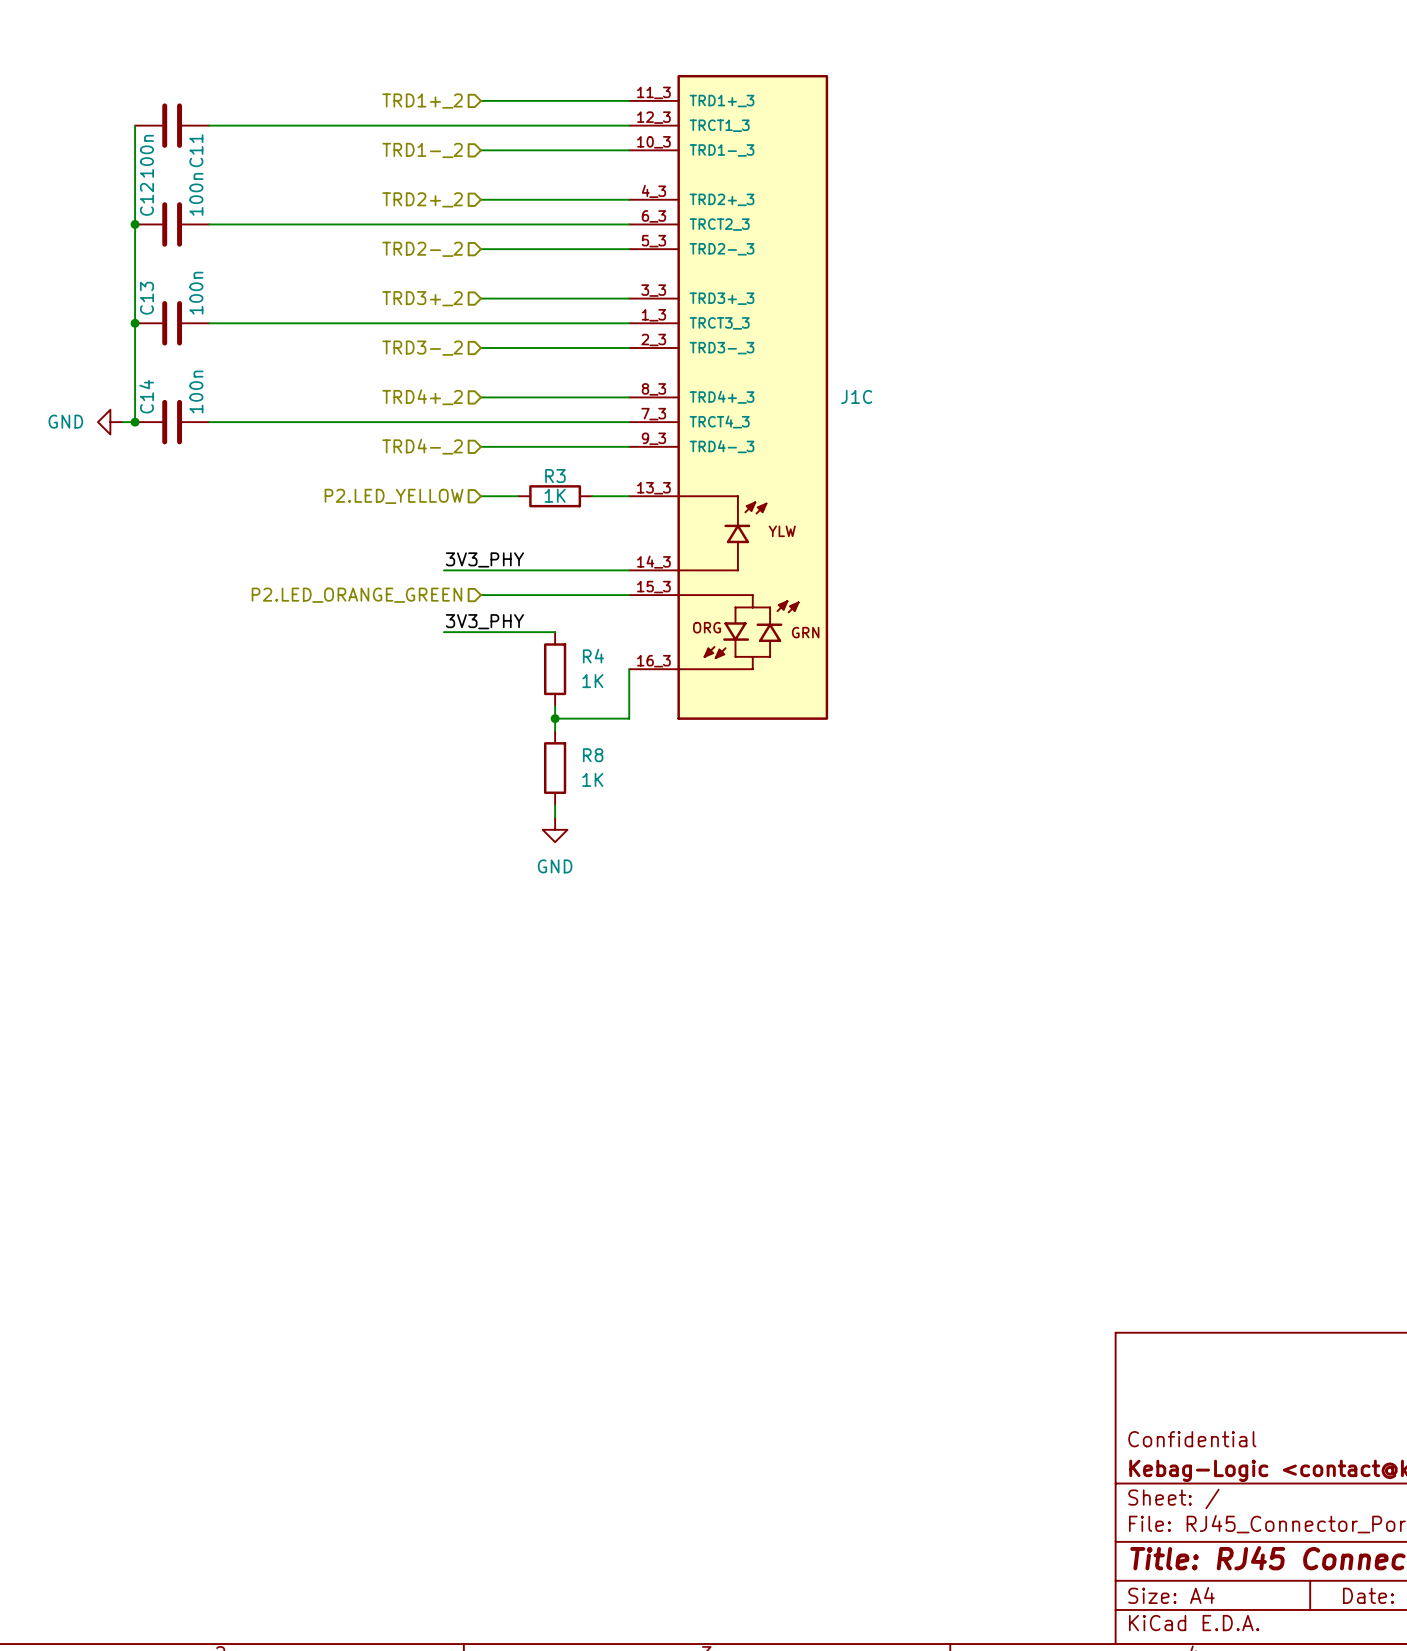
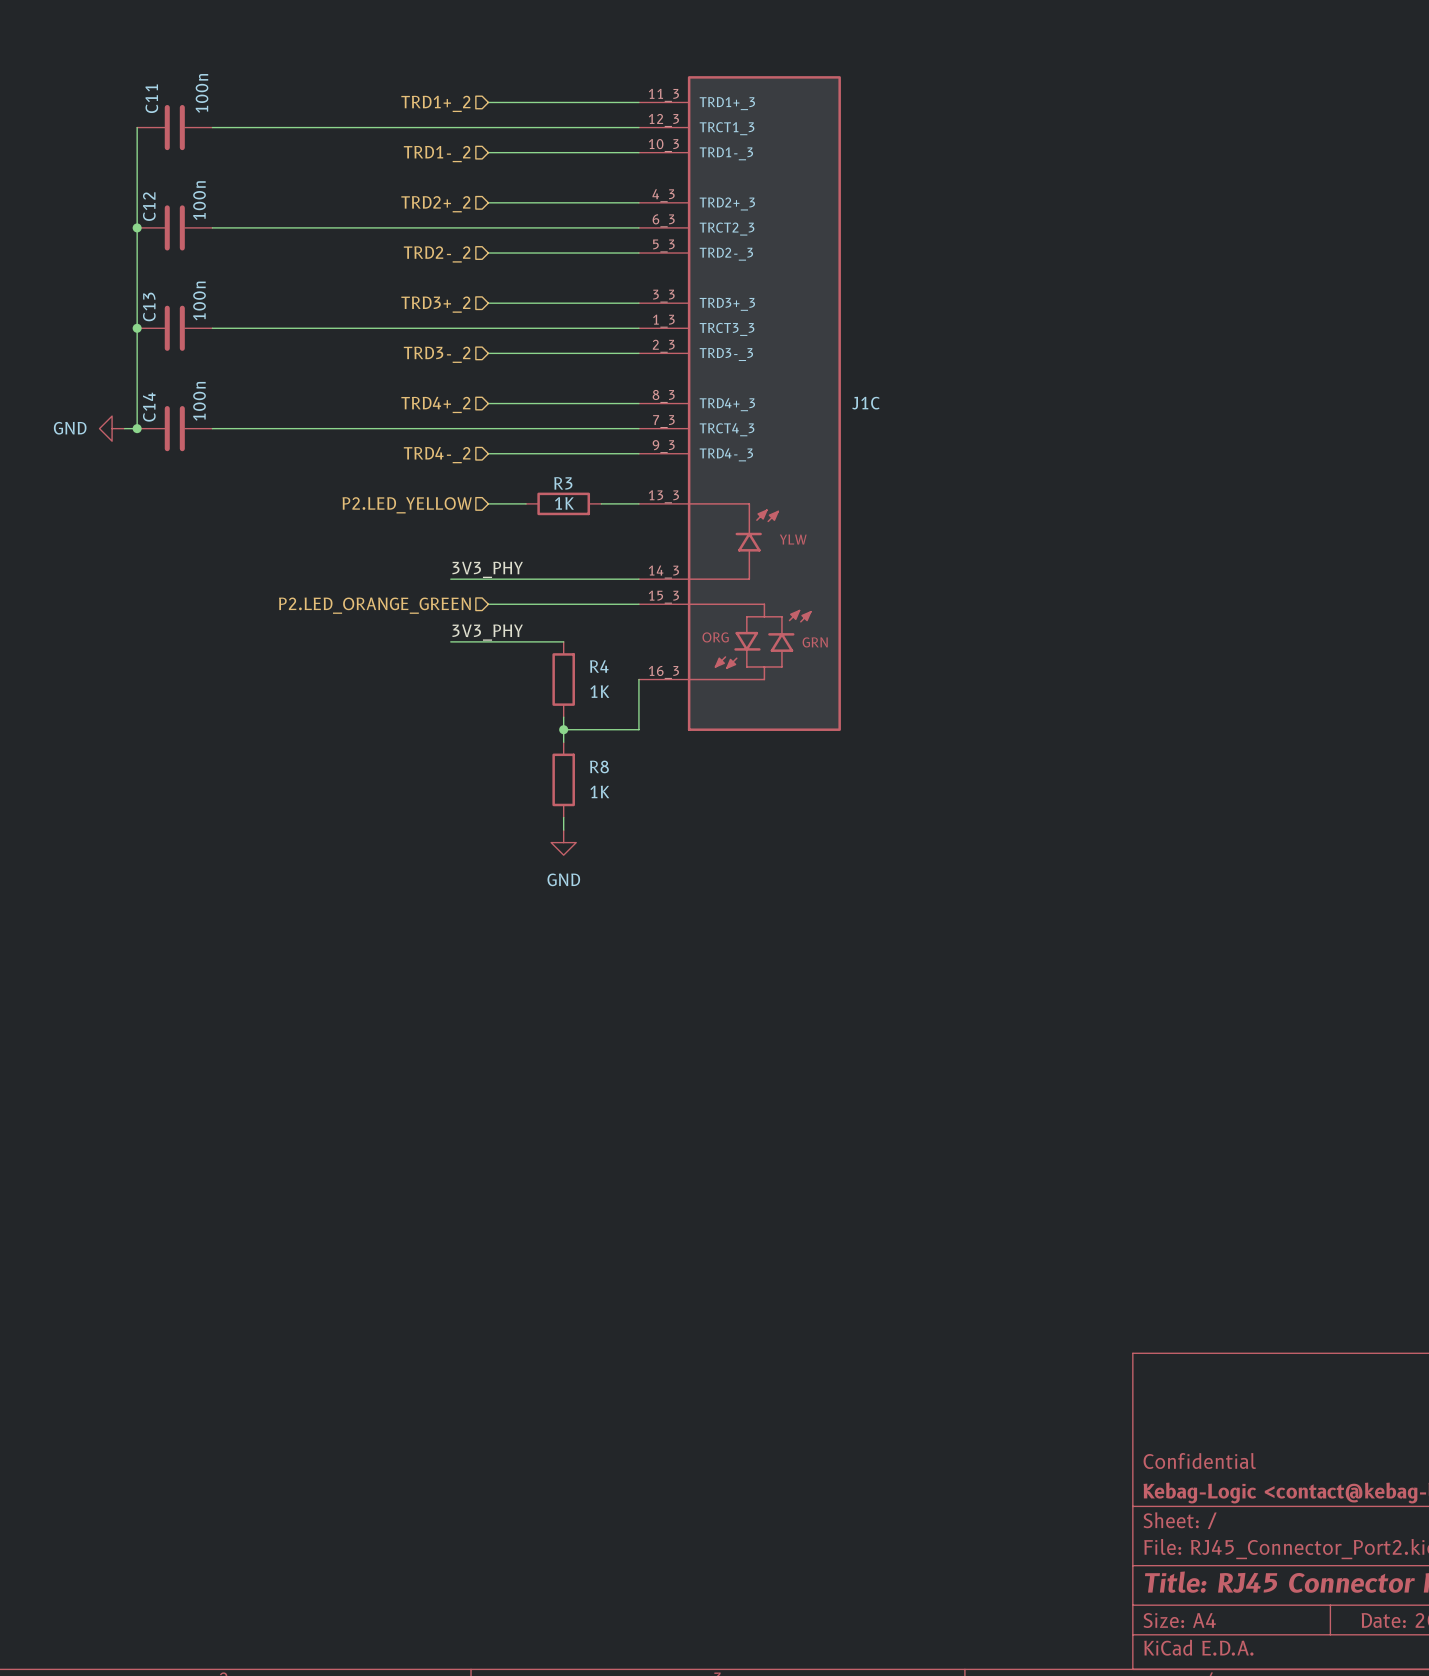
C11 name position: C11 (196, 150) -> C11 (151, 98)
C11 value position: 100n (146, 156) -> 100n (201, 93)

